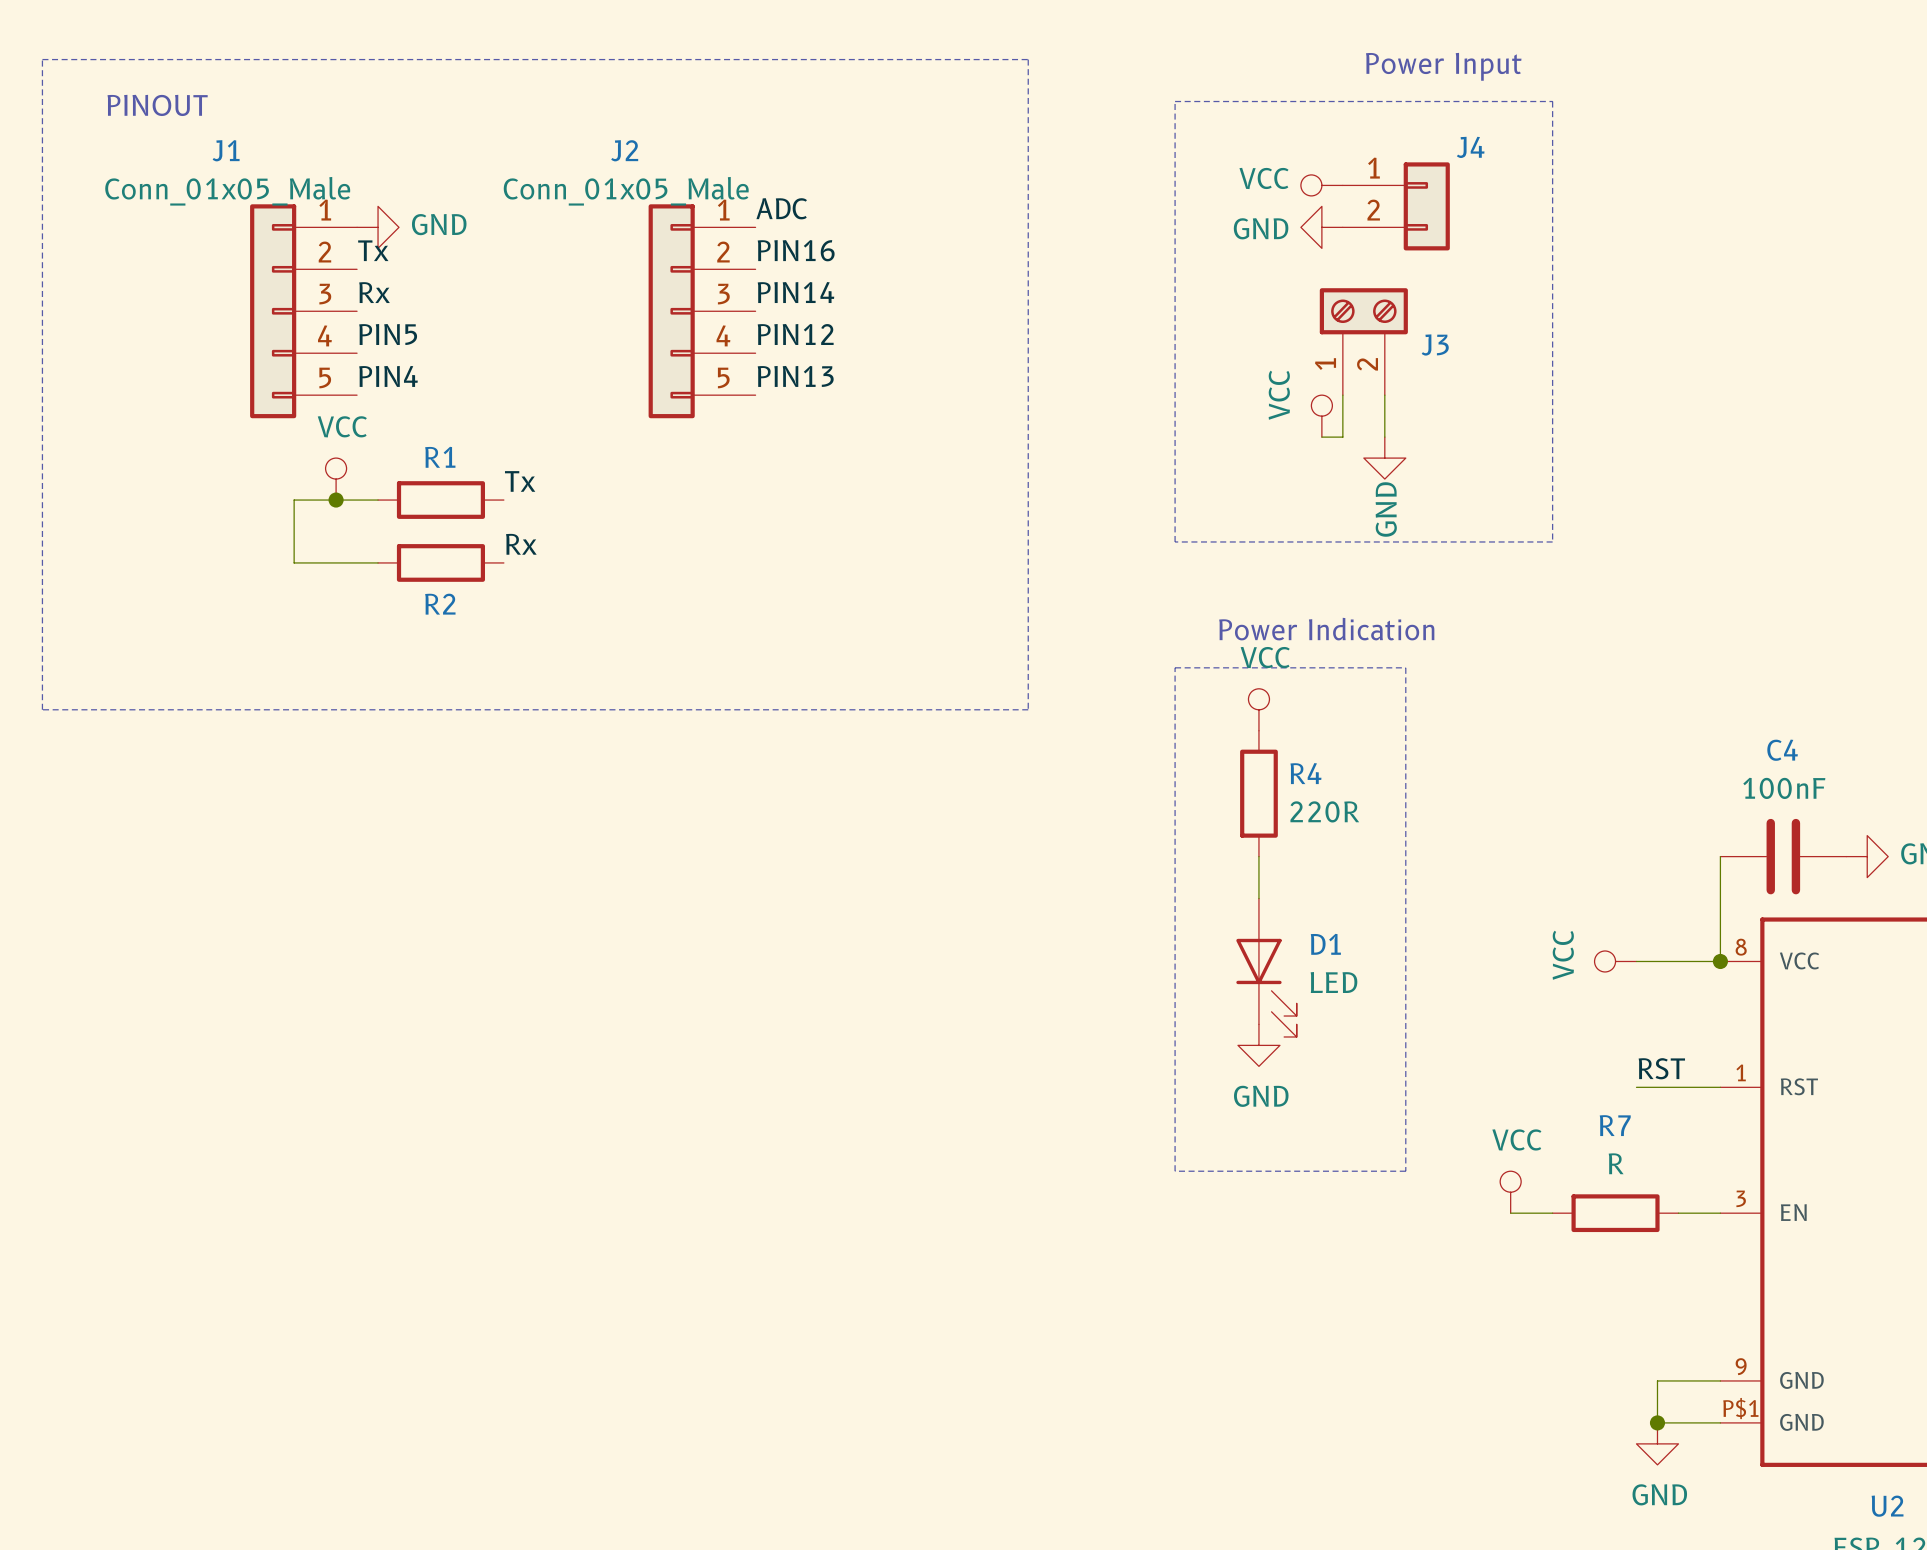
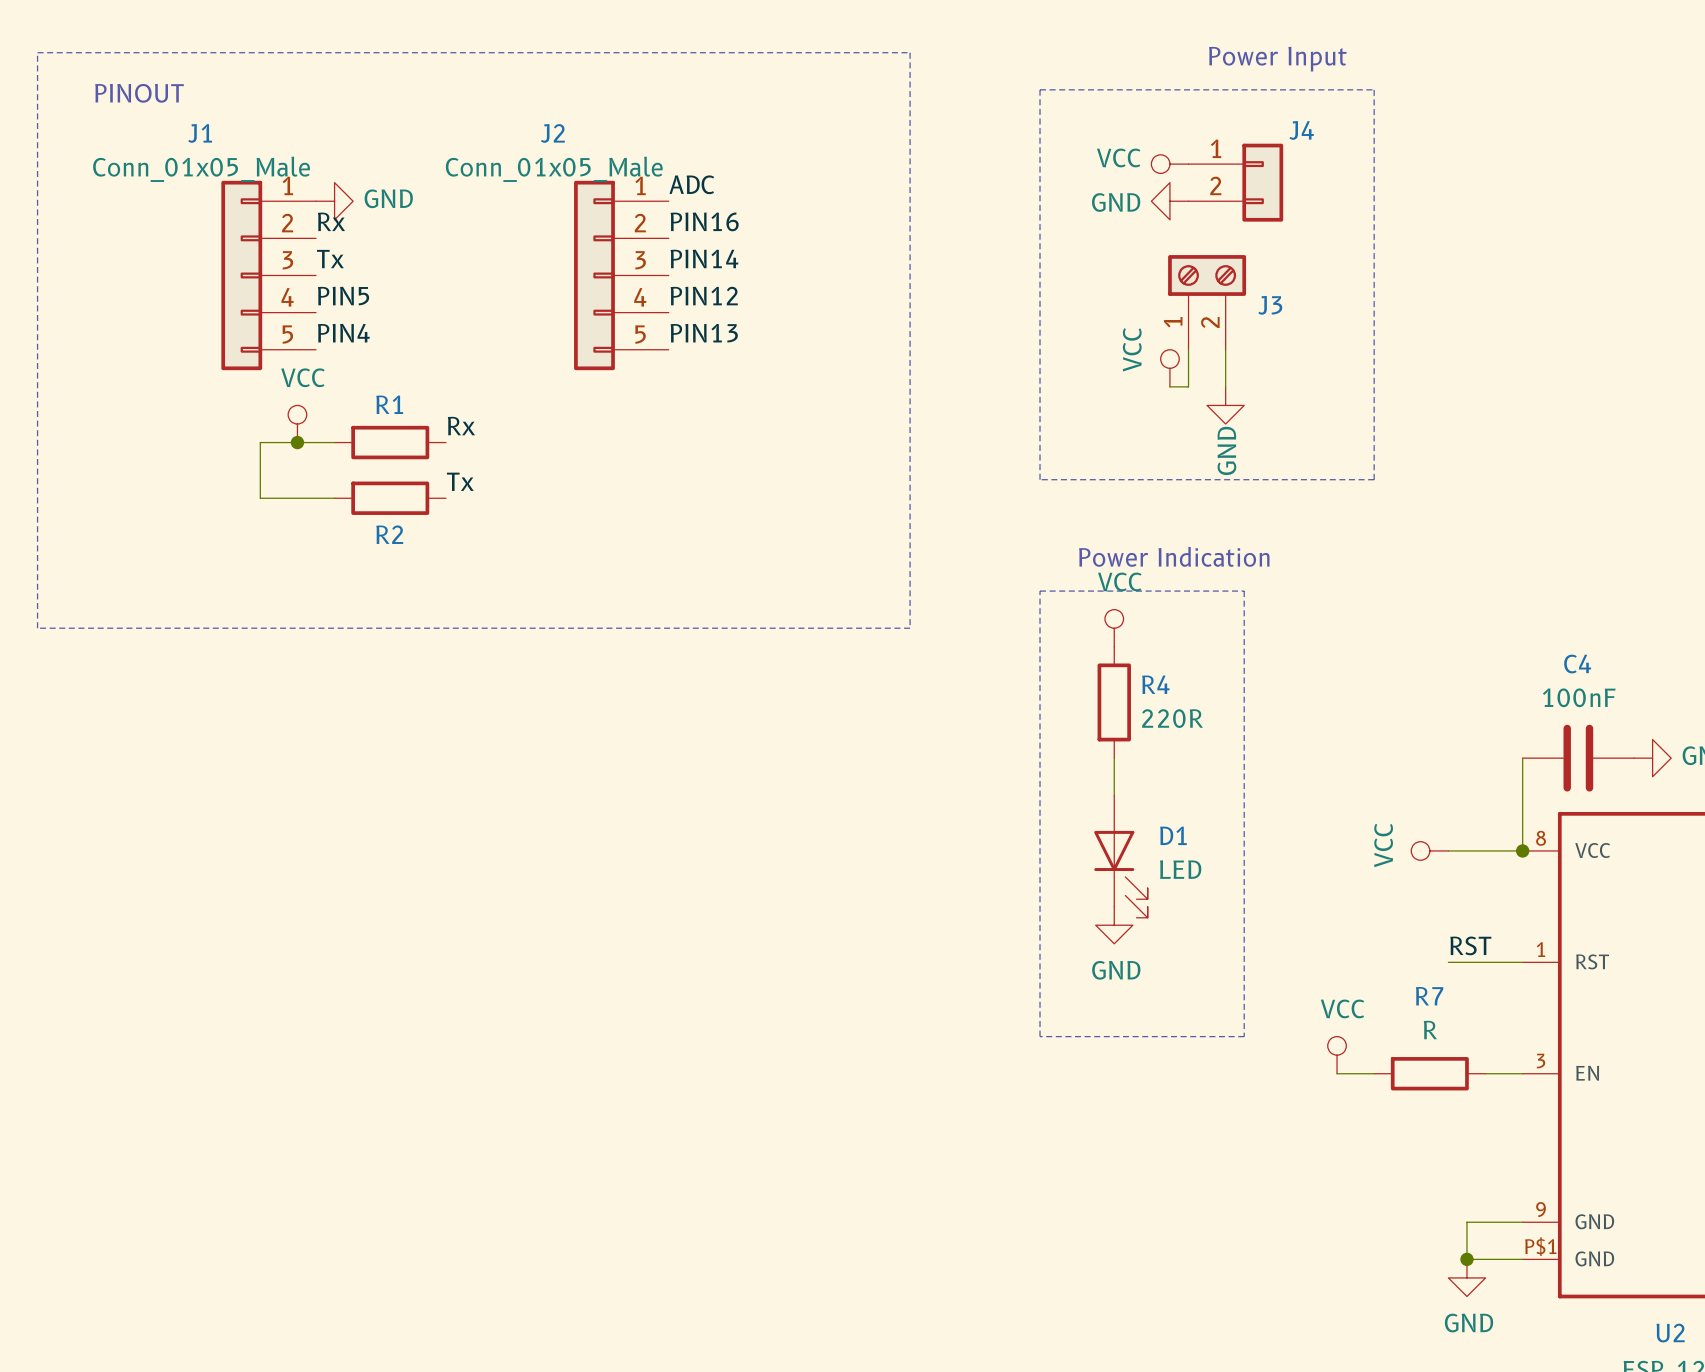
label: Tx (373, 250) -> Rx (331, 221)
label: Rx (374, 292) -> Tx (330, 259)
label: Tx (520, 481) -> Rx (461, 426)
label: Rx (521, 544) -> Tx (460, 481)

